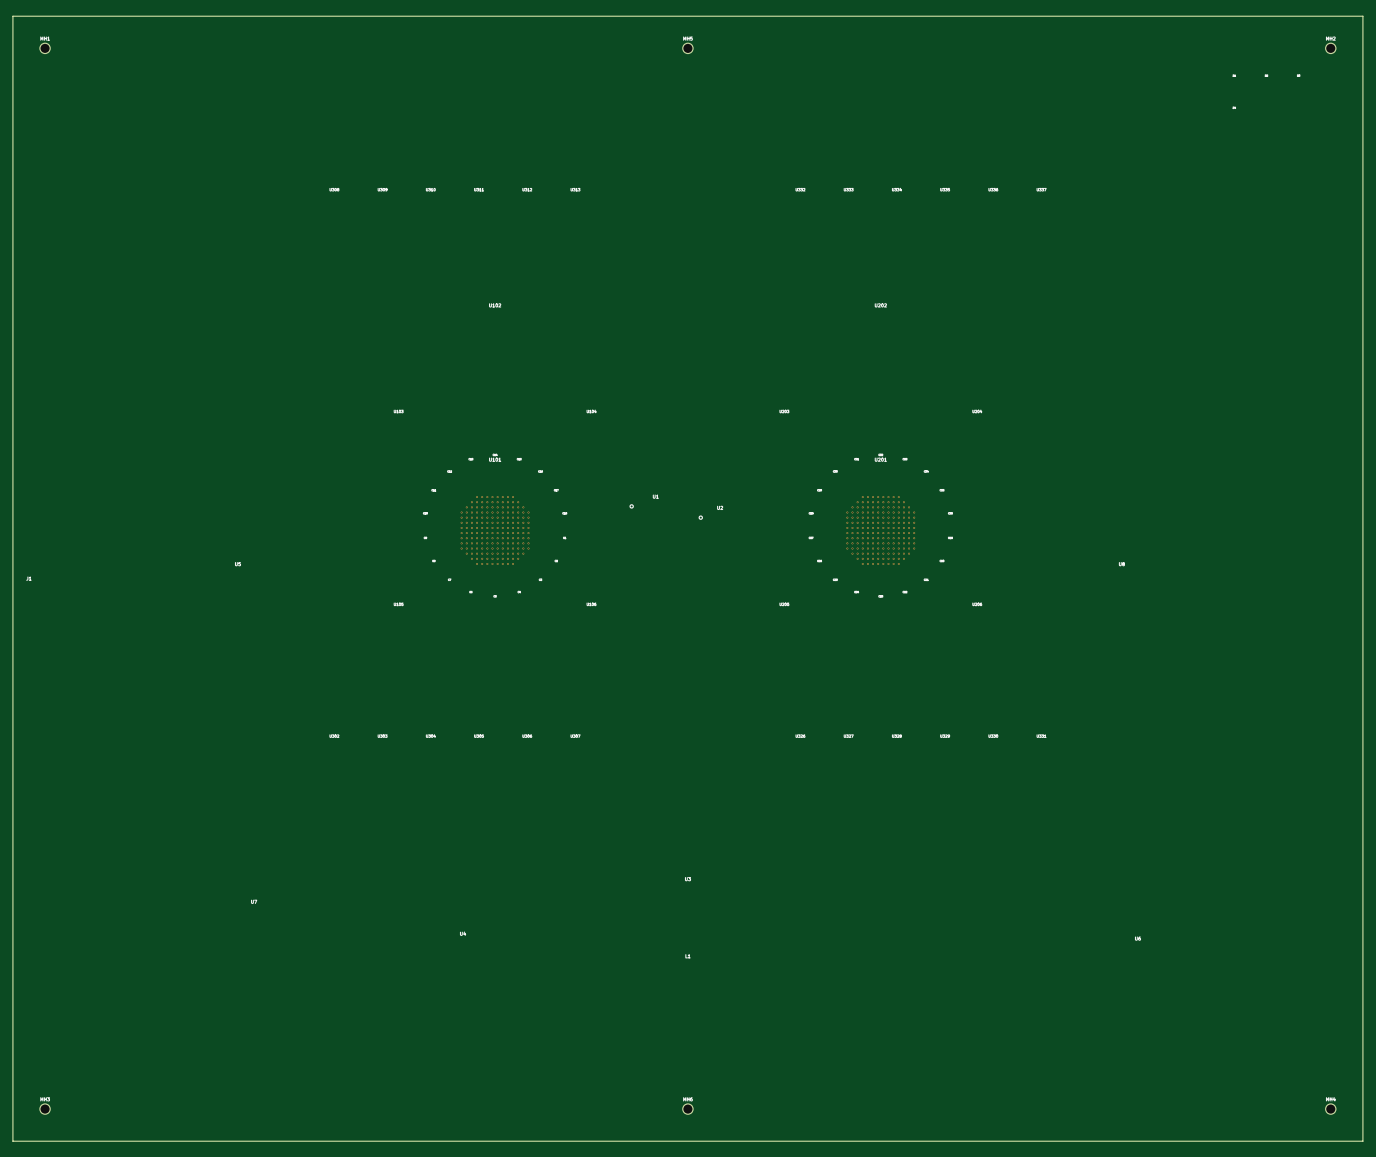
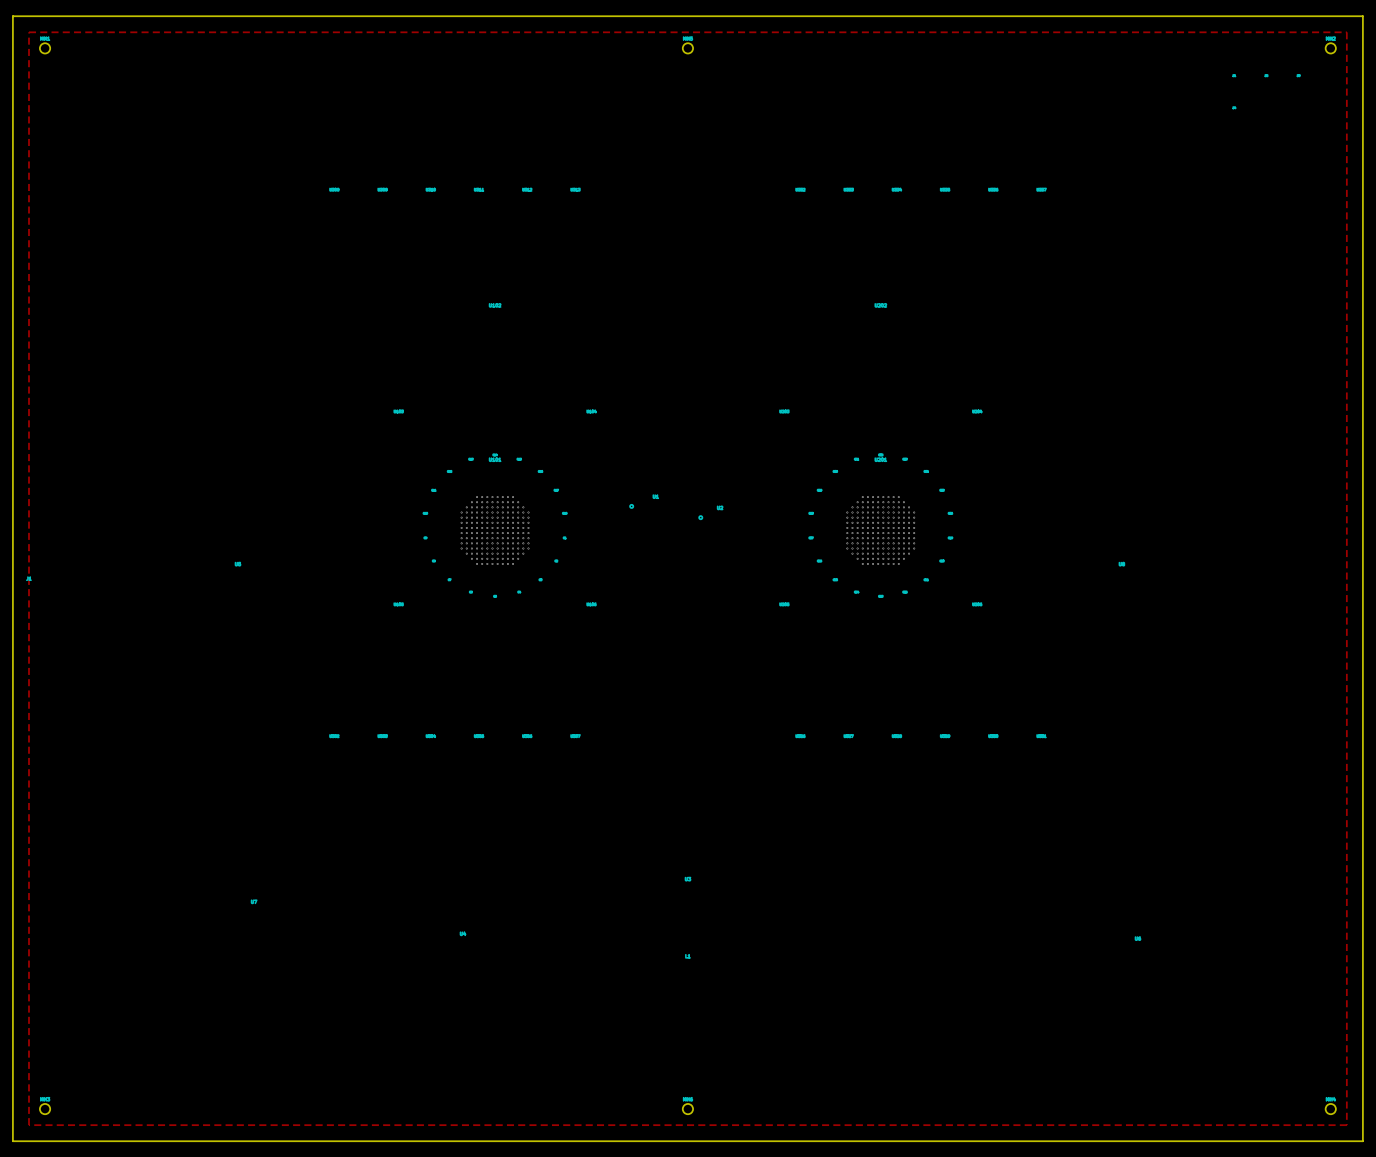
zone outline: none -> (28, 32) (1346, 32) (1346, 1125) (28, 1125) (28, 32)

